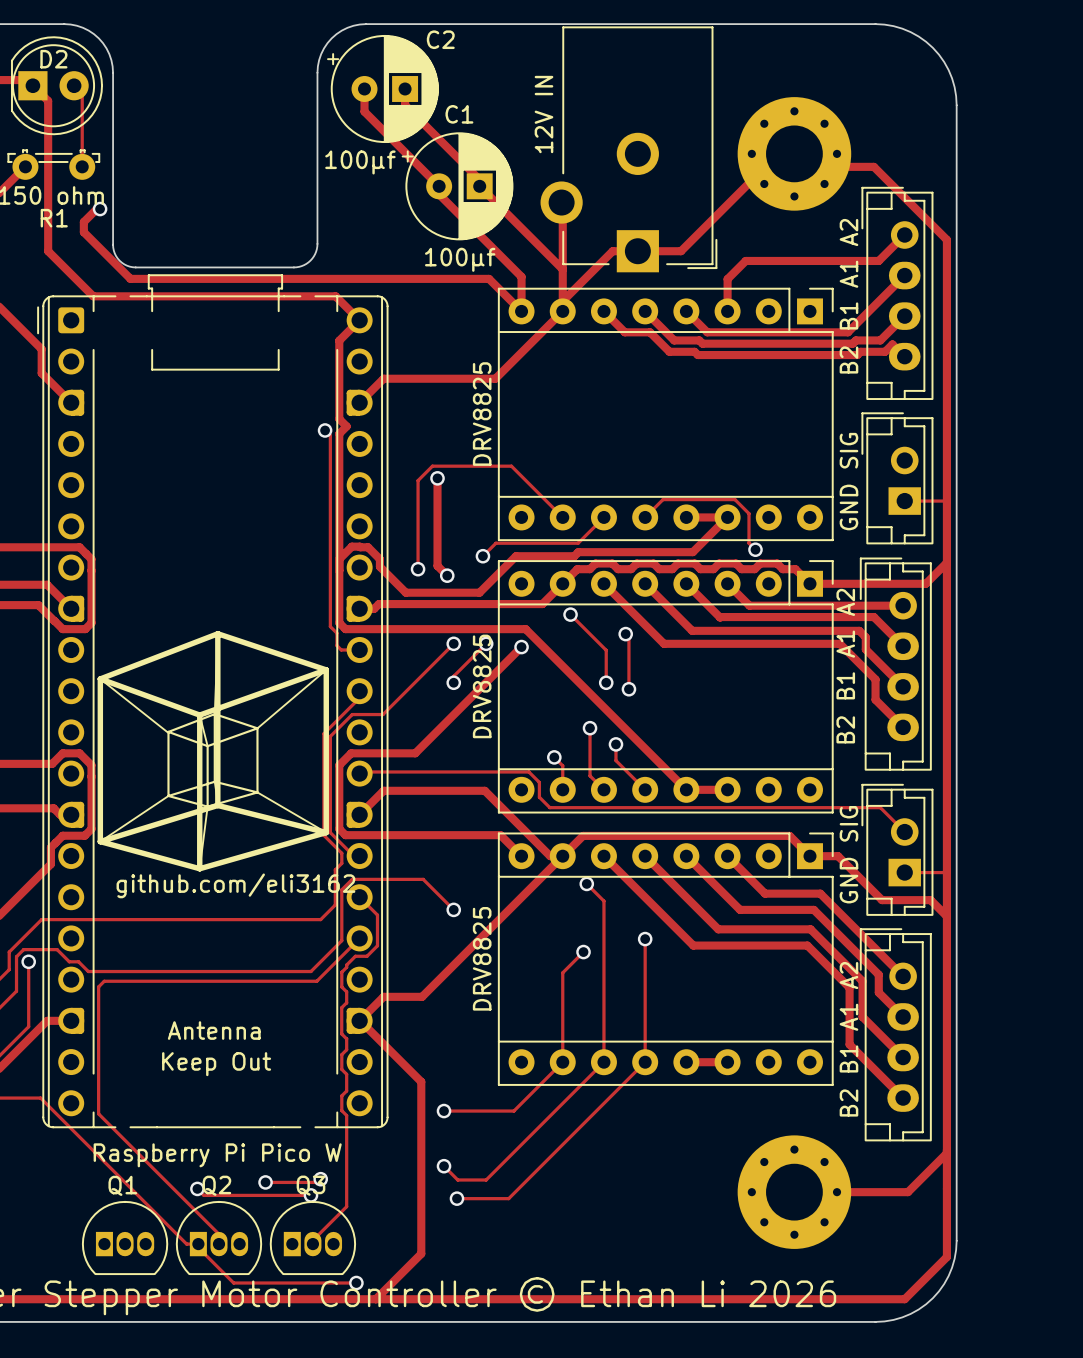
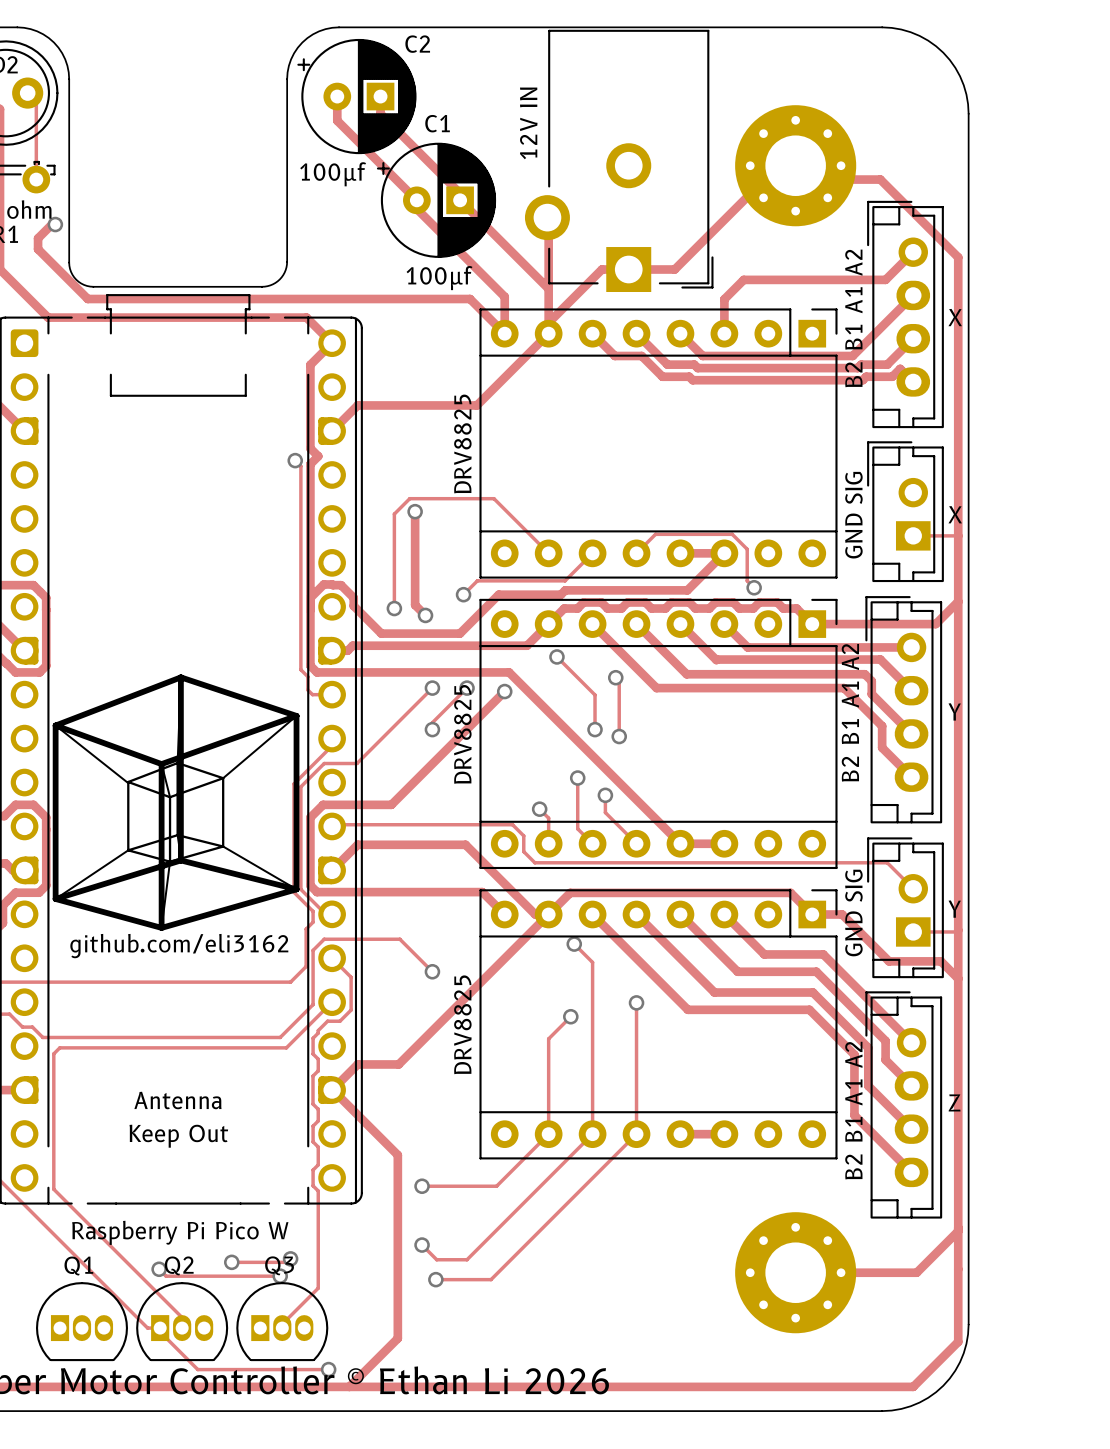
text: none -> X (955, 317)
text: none -> X (955, 514)
text: none -> Y (954, 711)
text: none -> Y (954, 909)
text: none -> Z (954, 1102)

